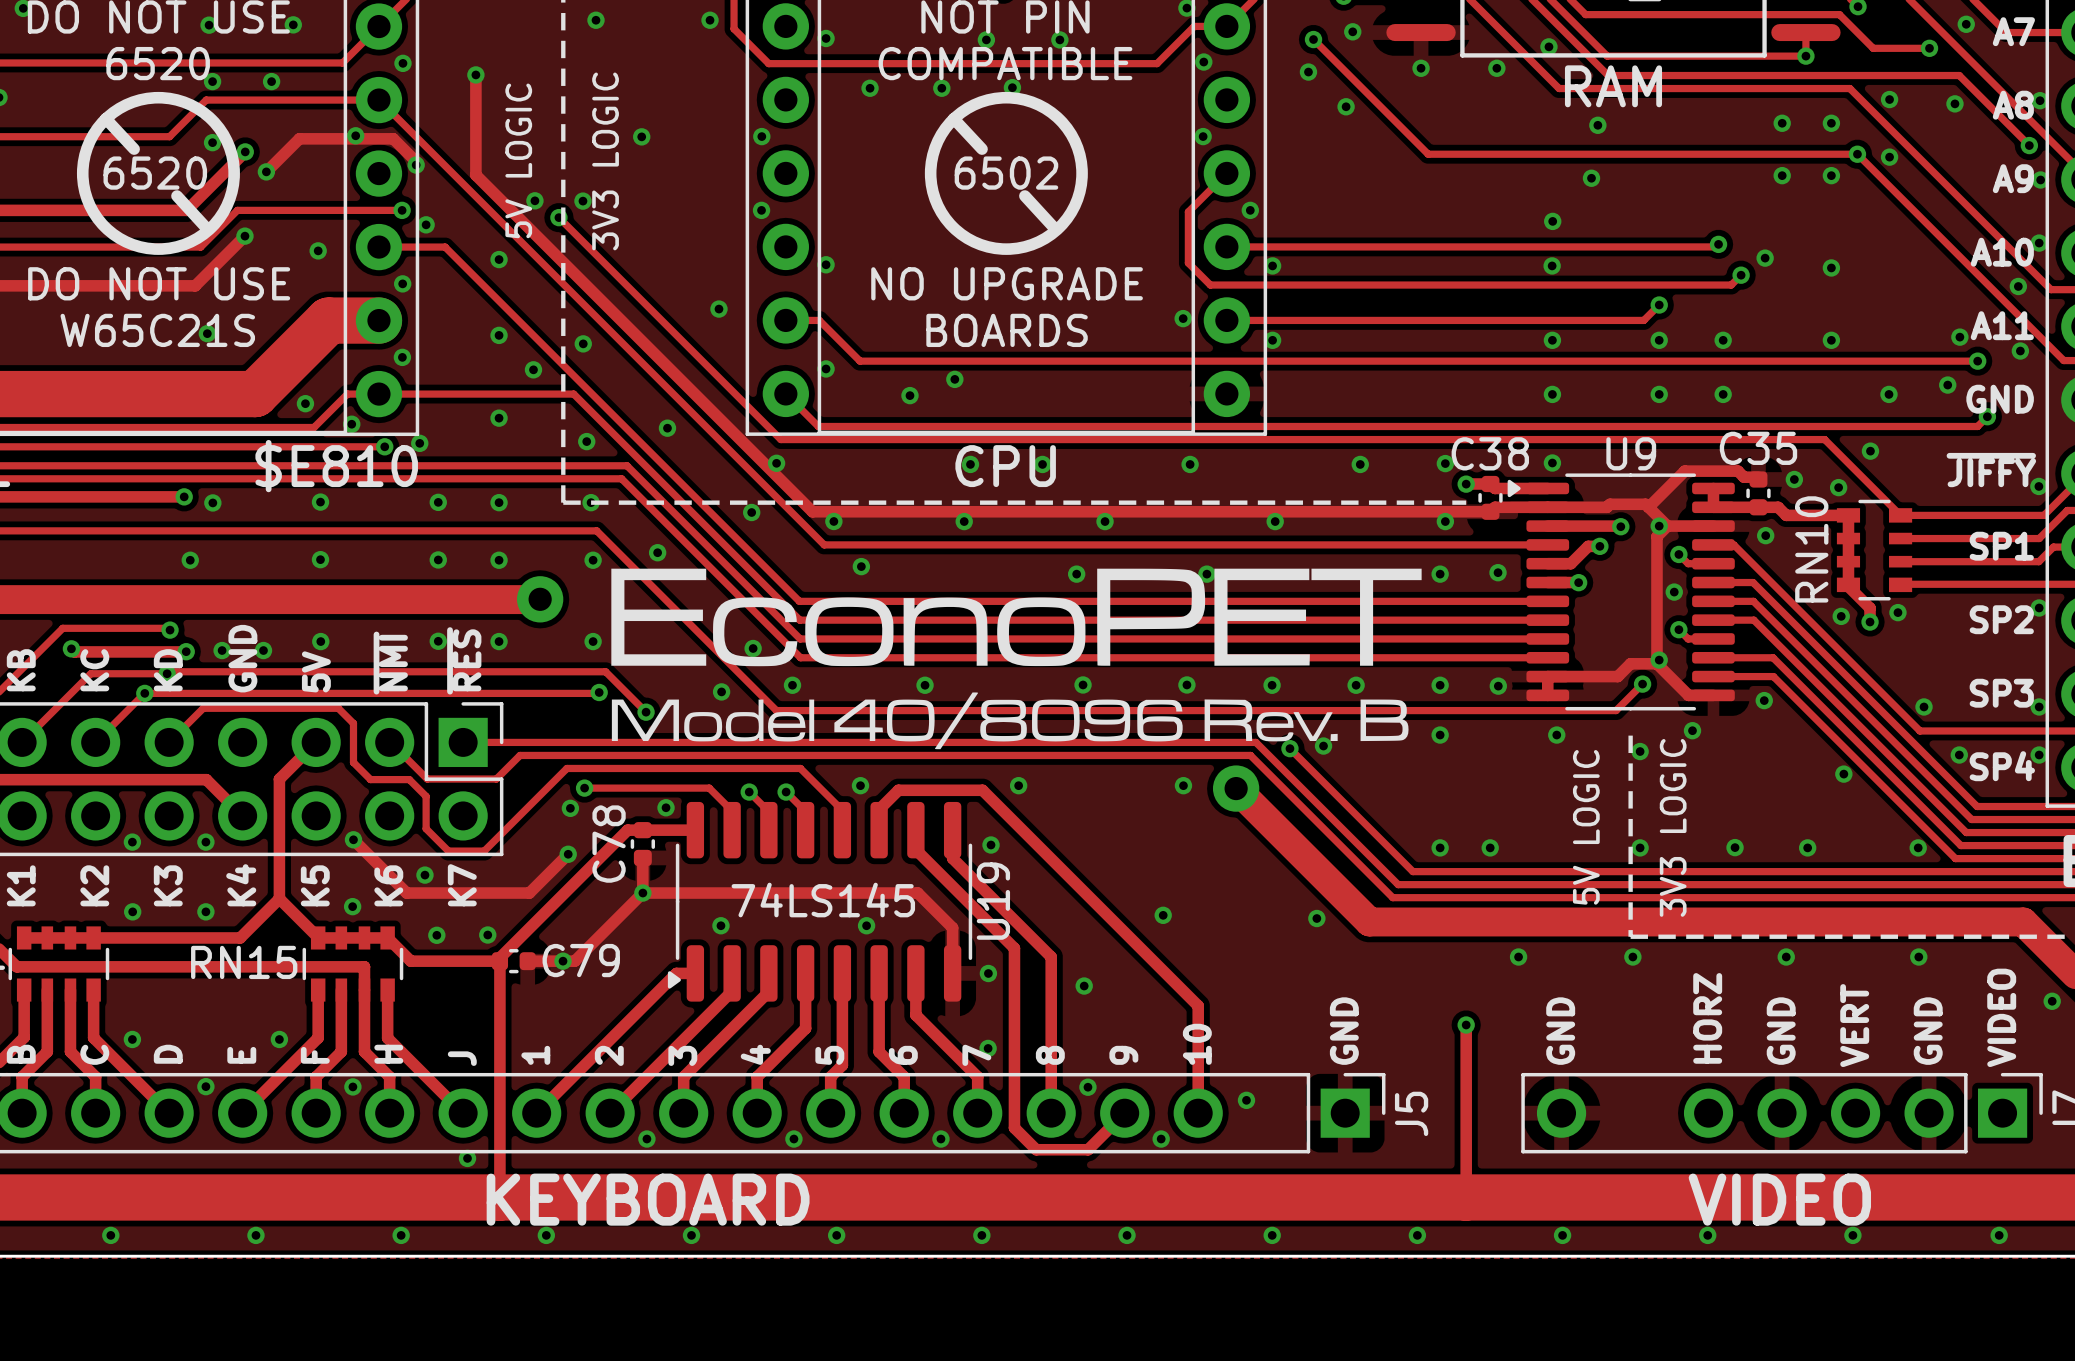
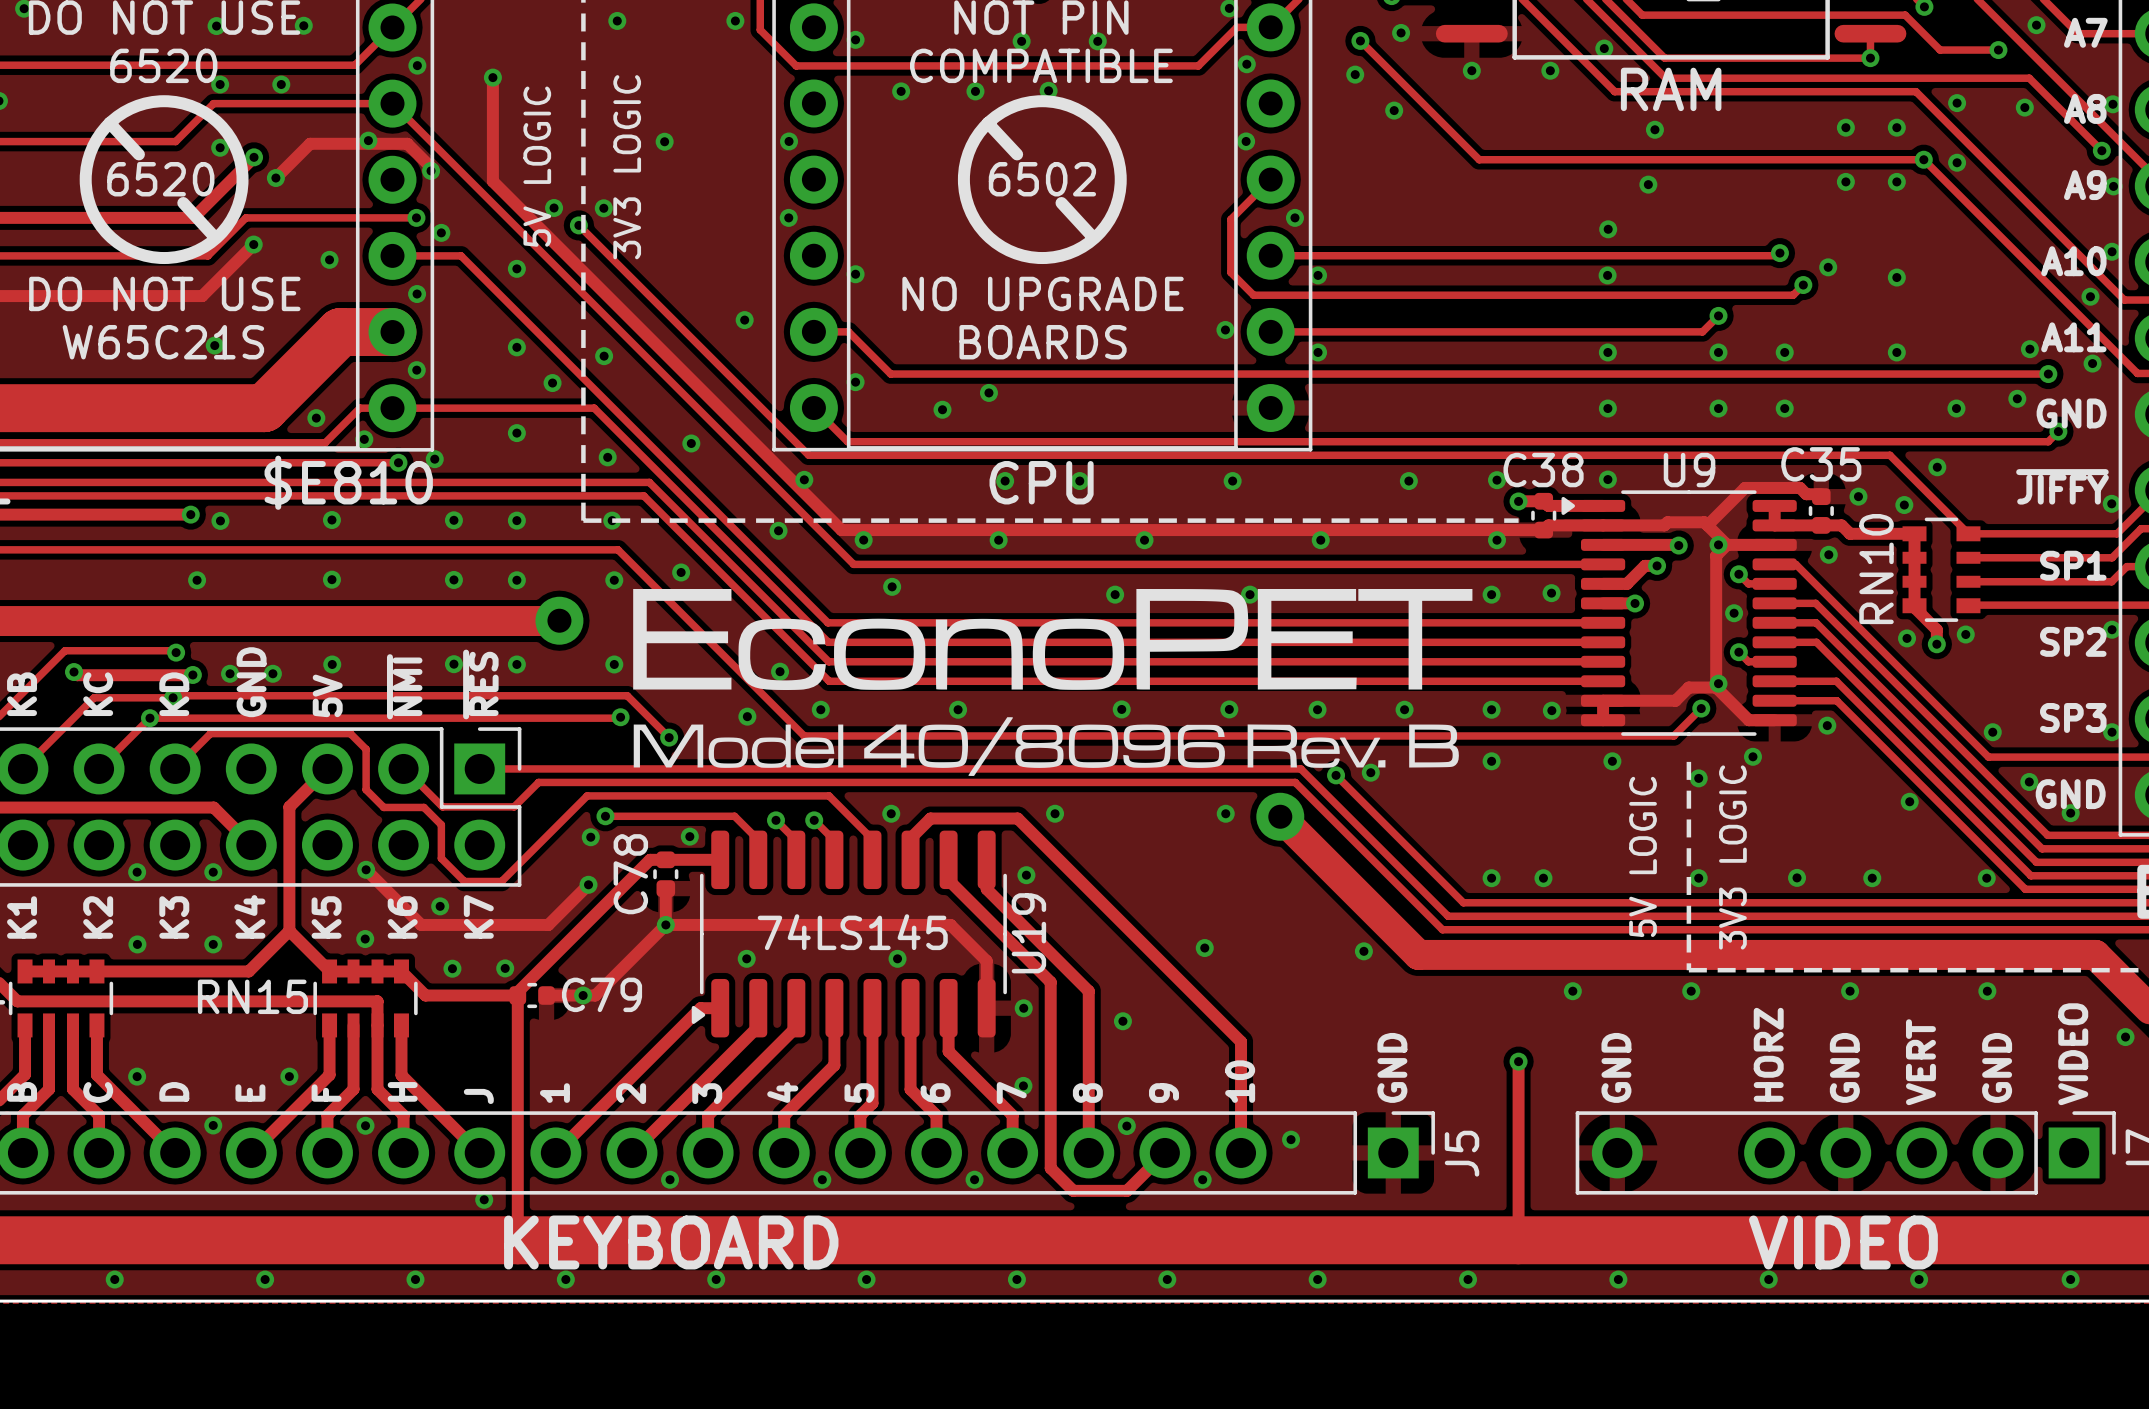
via position: (2039, 755) -> (2070, 813)
text: SP4 (2002, 766) -> GND (2070, 794)

